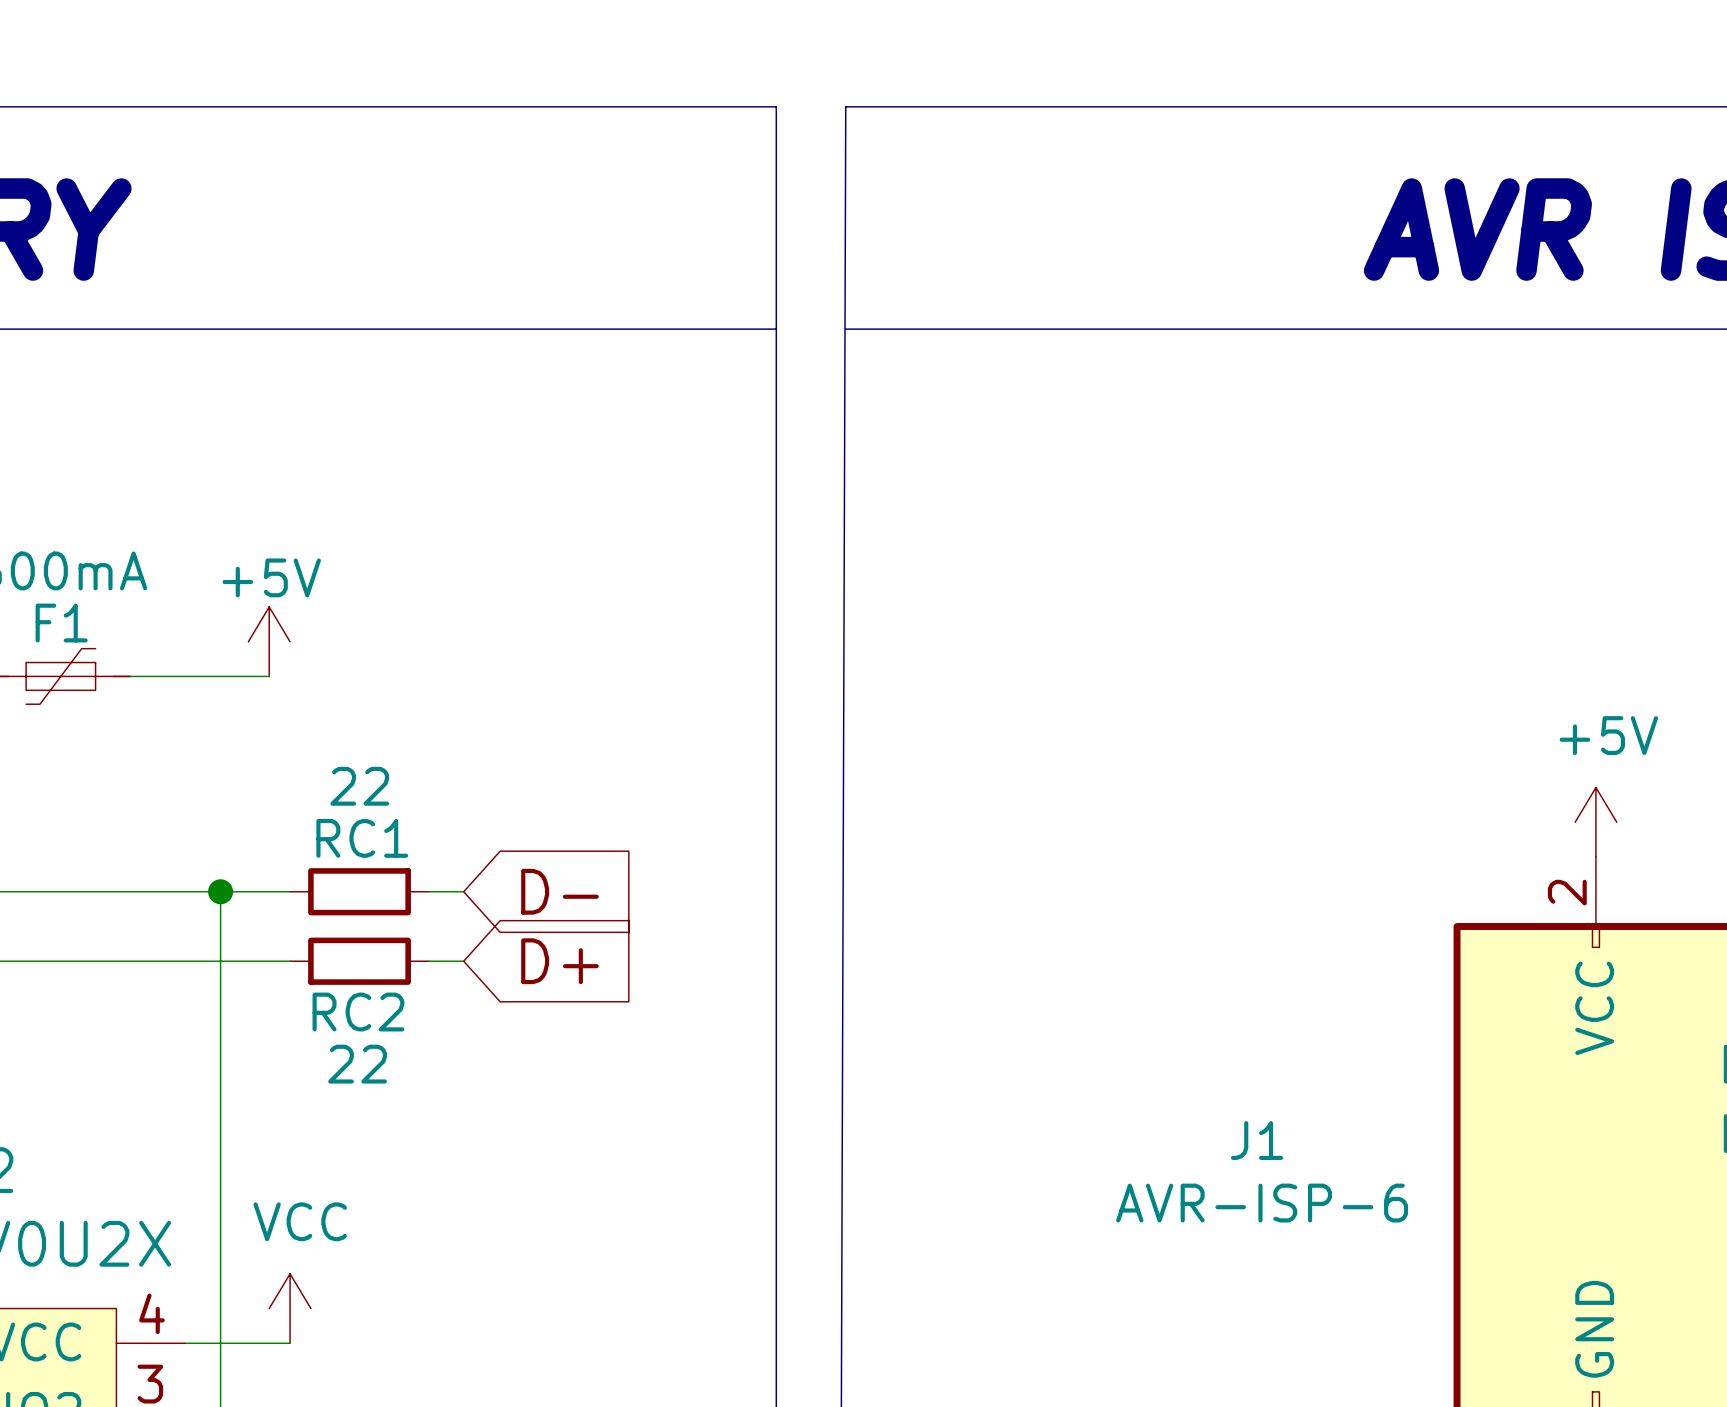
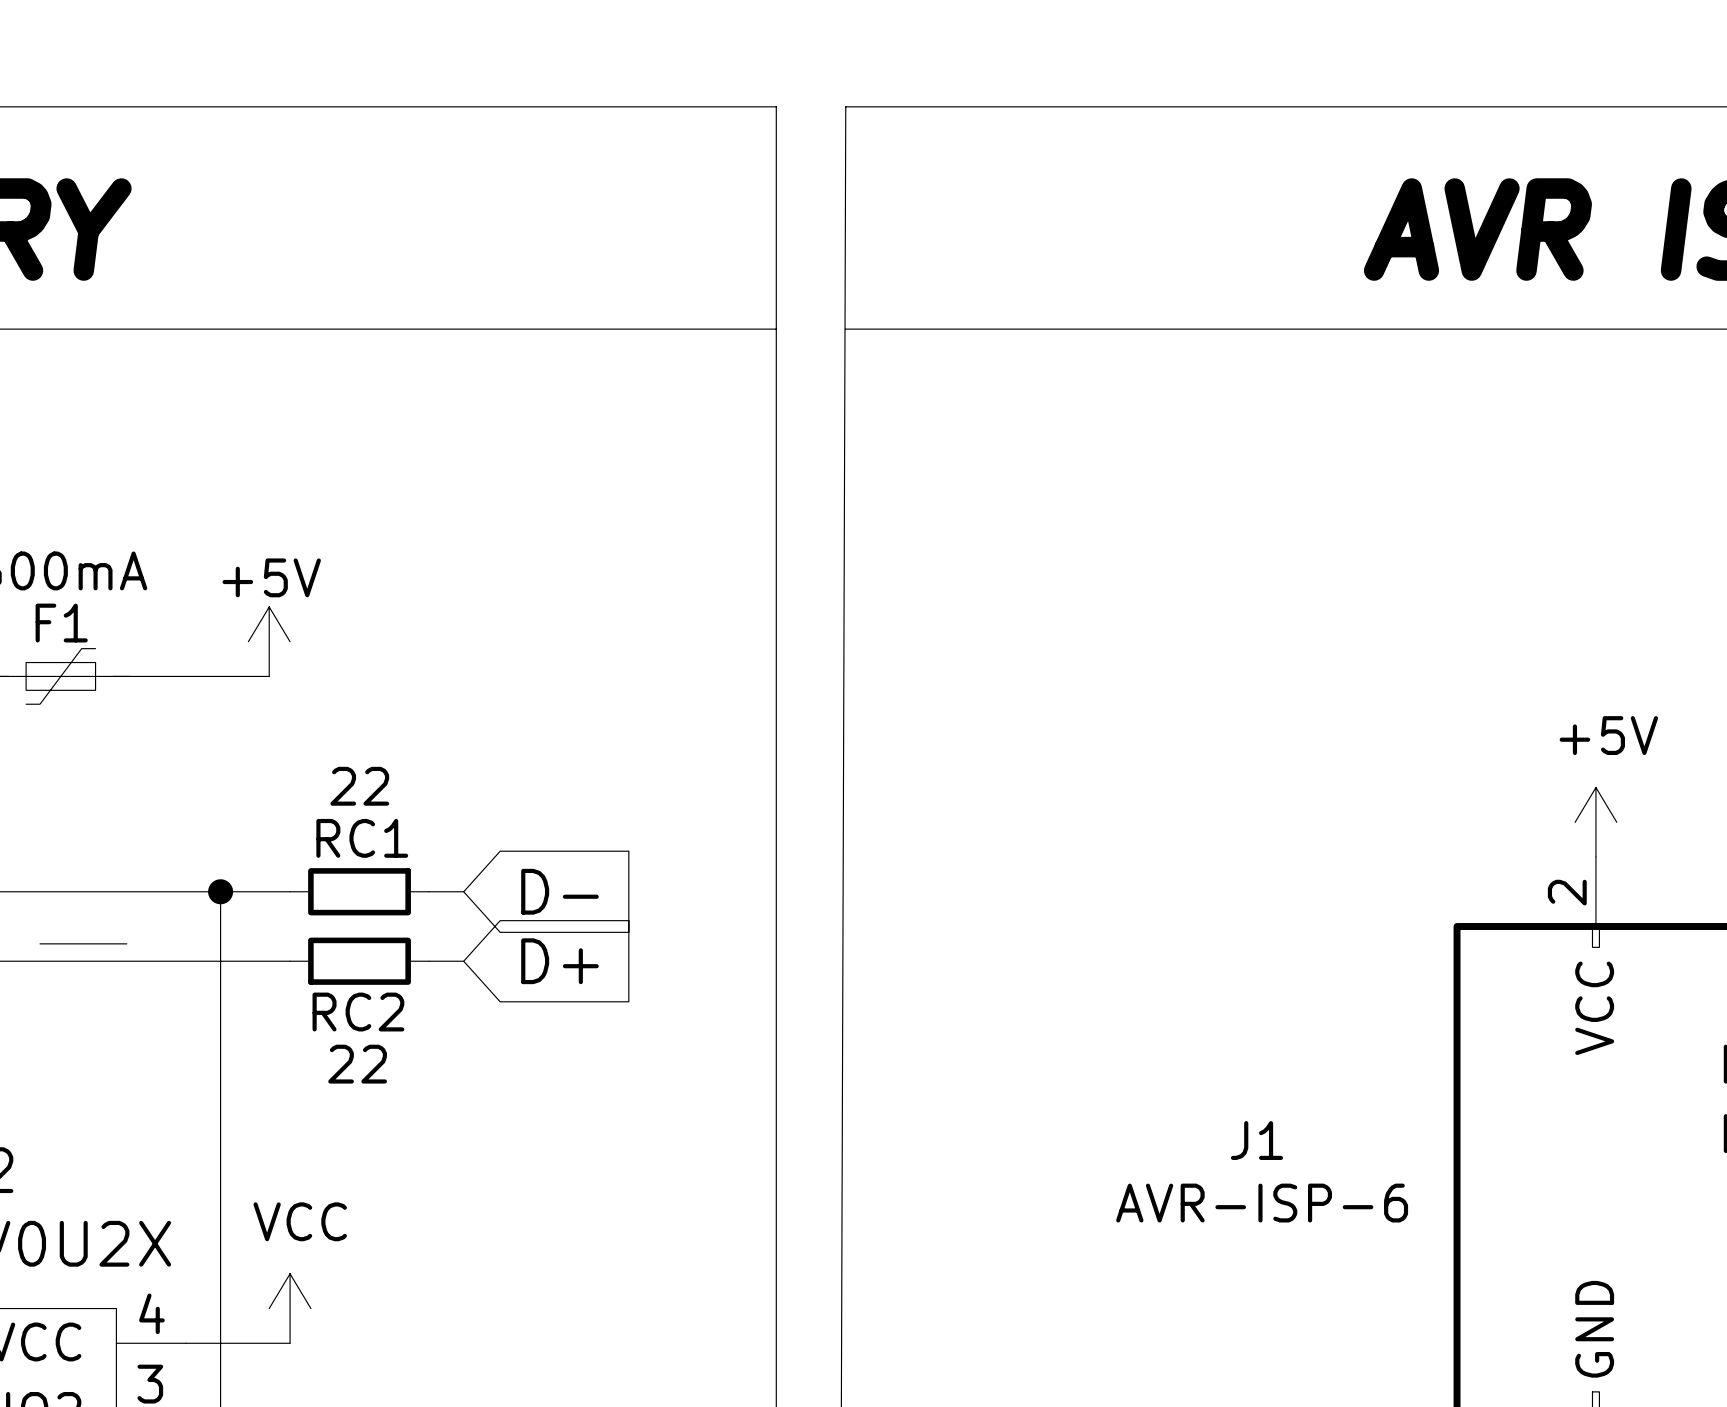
wire: none -> (39, 943) (126, 943)

